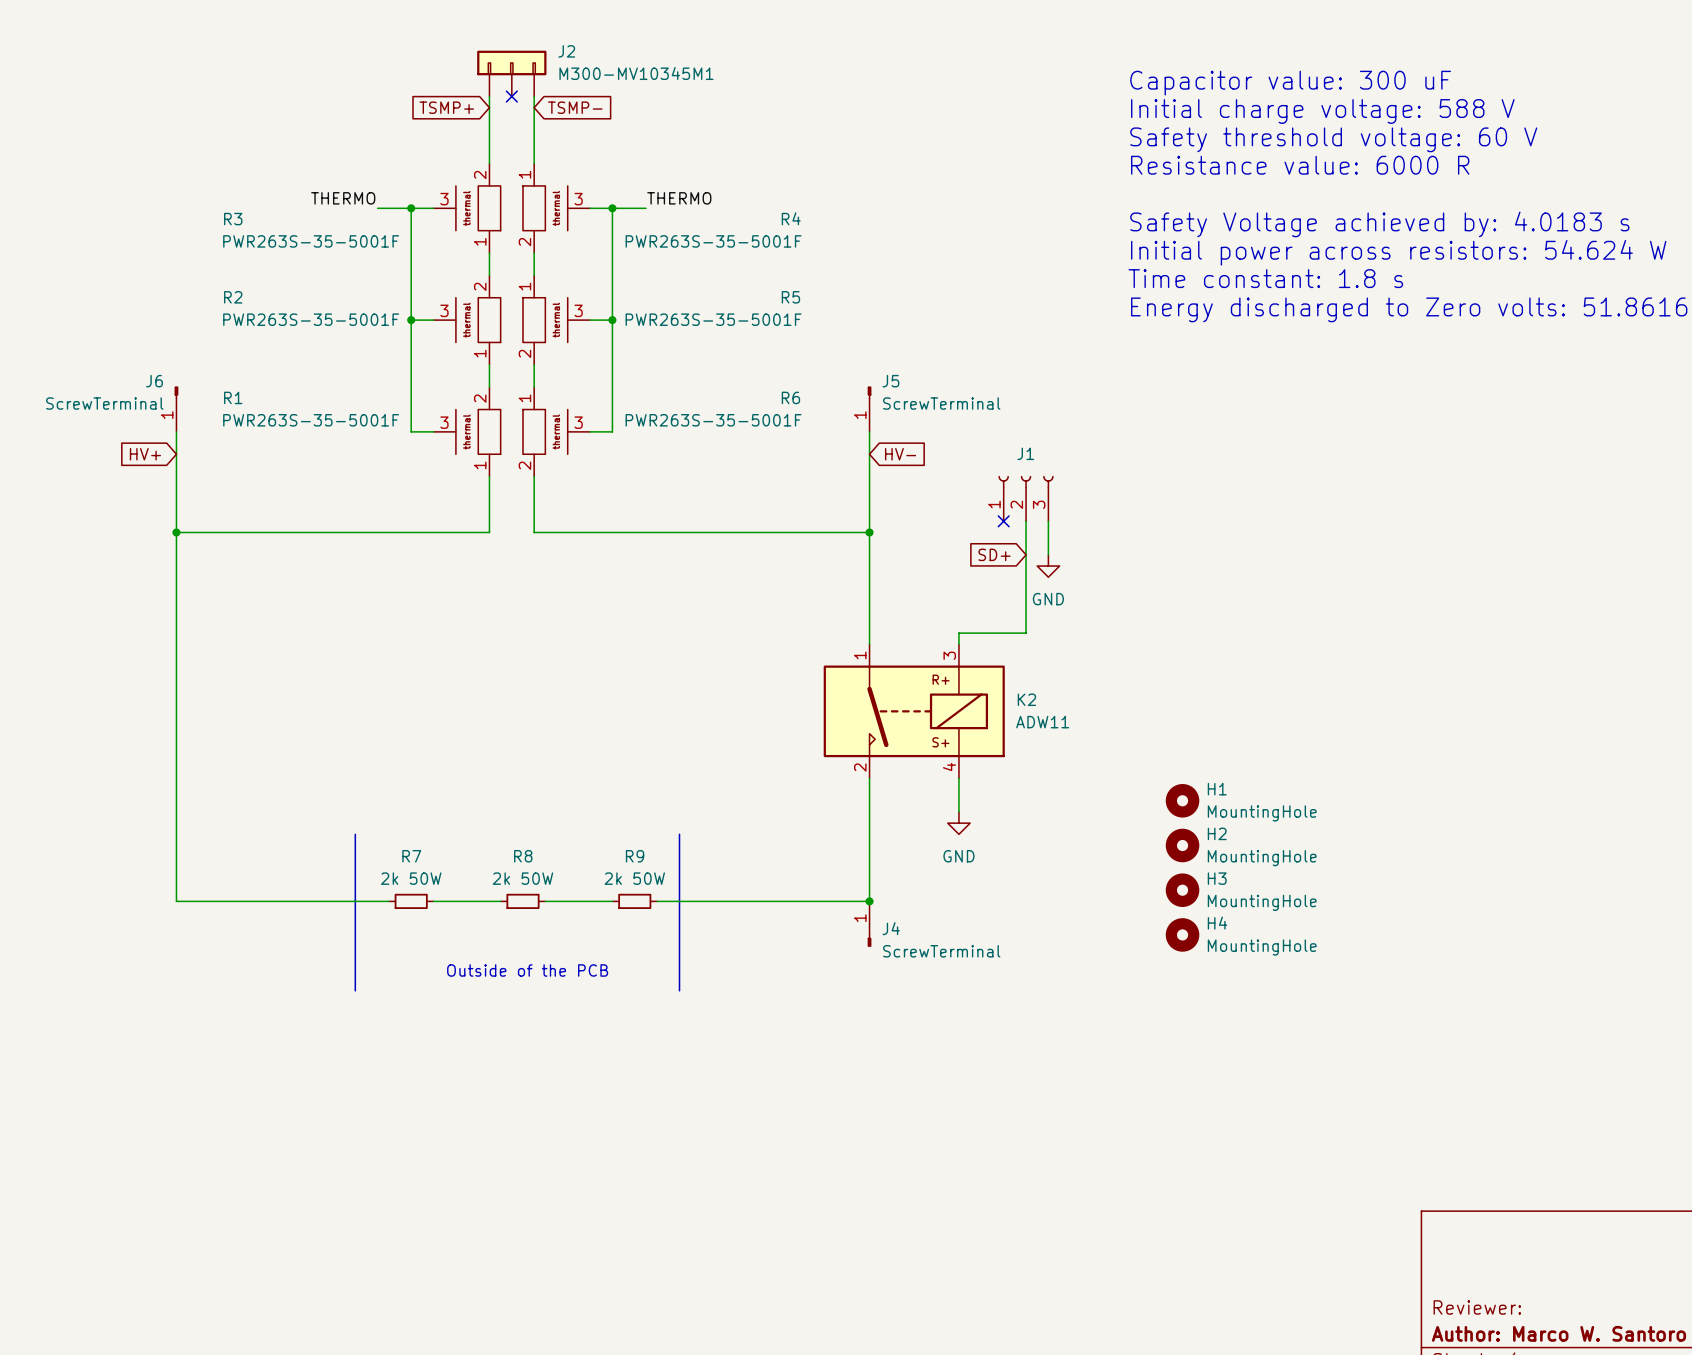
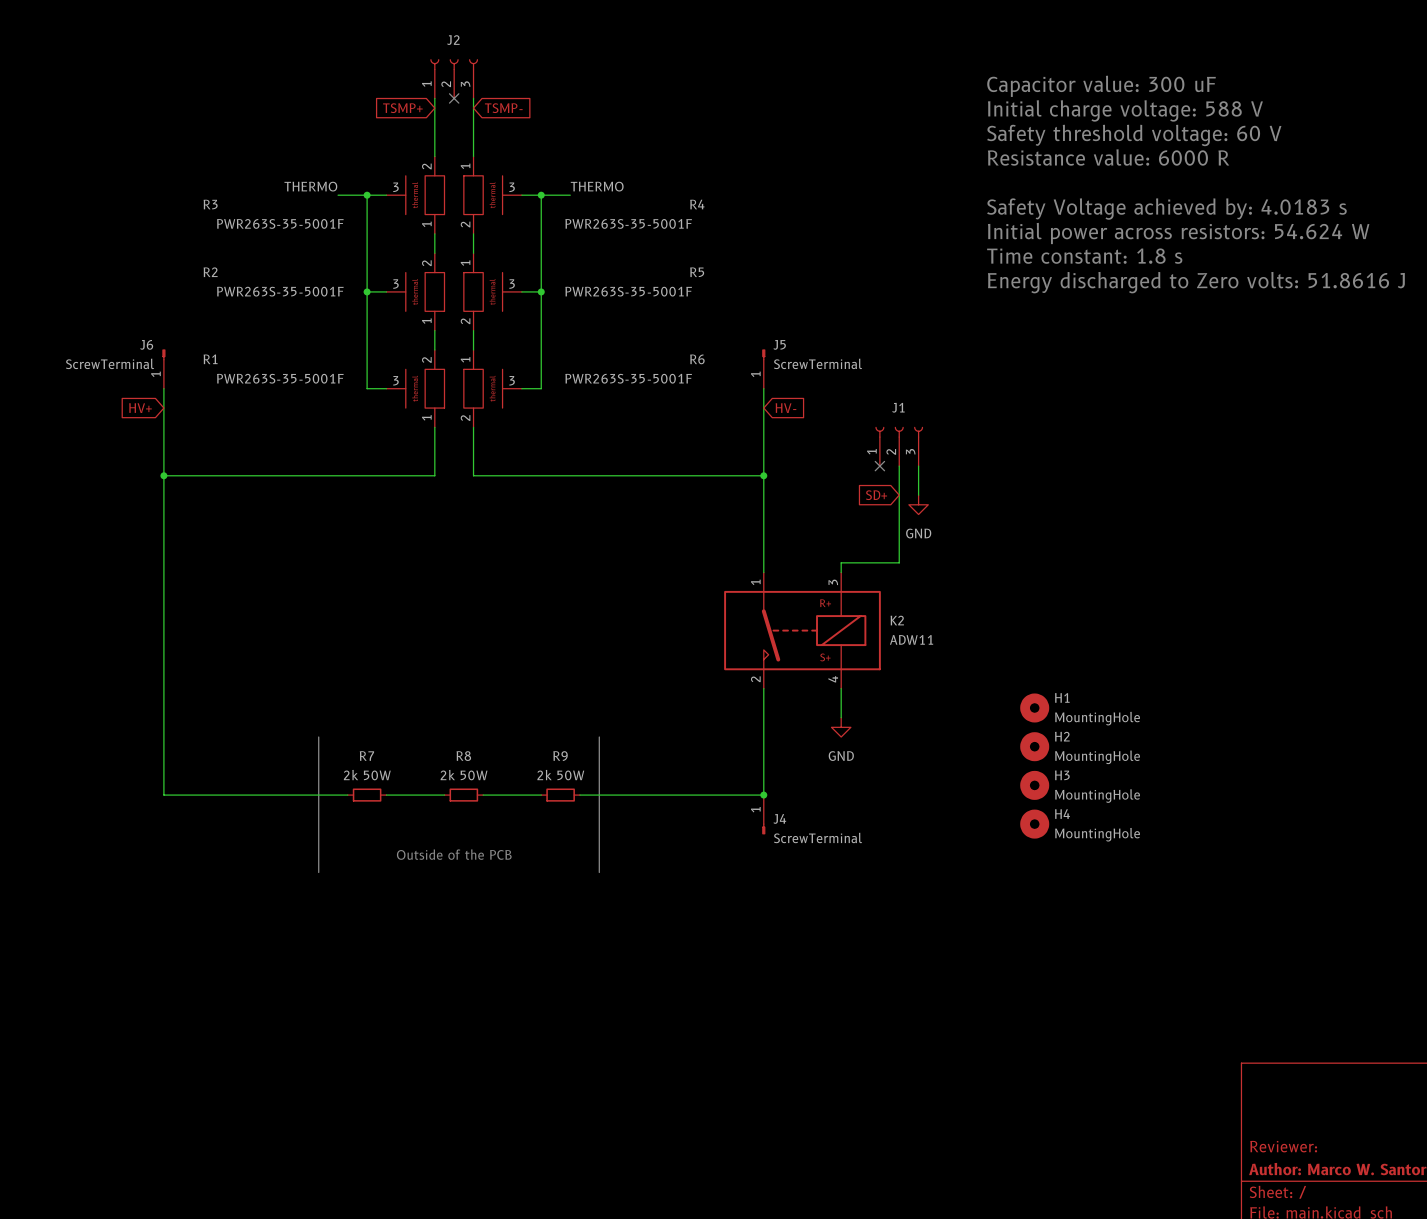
J2 symbol: [477, 50, 547, 97] -> [430, 59, 478, 99]
J2 name position: J2 (566, 51) -> J2 (453, 40)
J2 value: M300-MV10345M1 (636, 73) -> none

